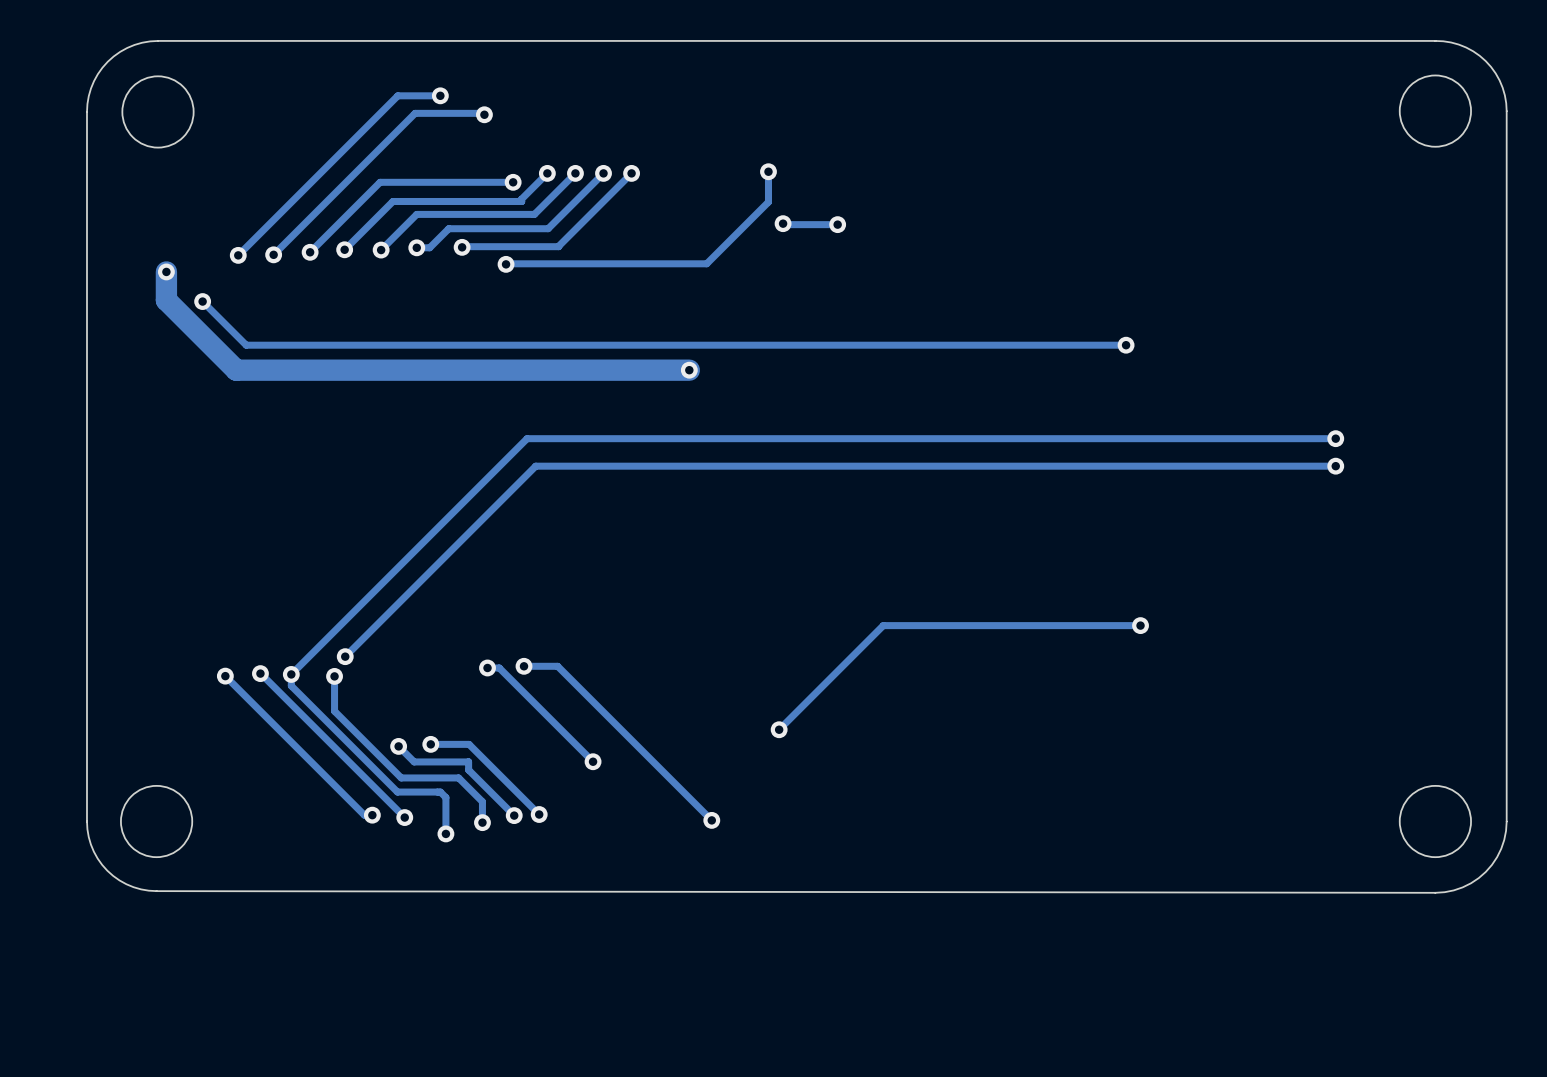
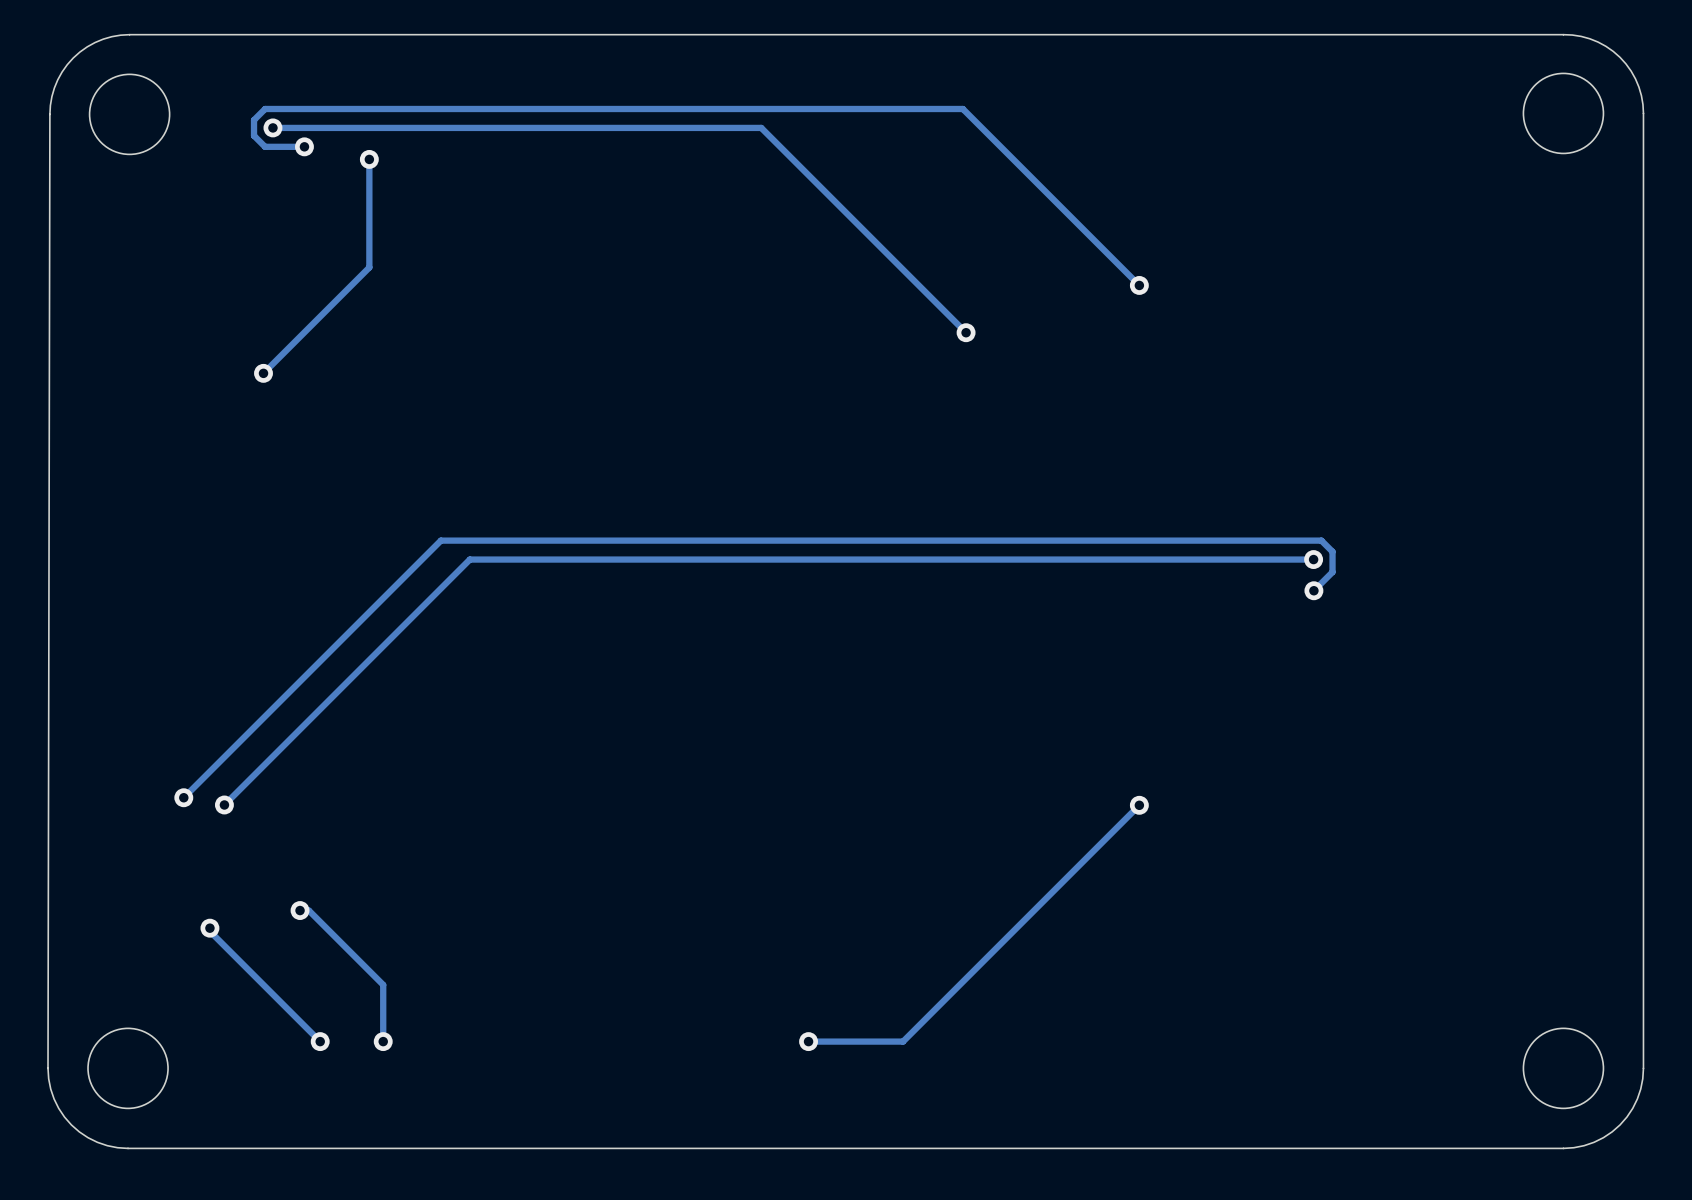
track: (440, 95) (397, 95) (238, 255) -> none
via: (440, 95) -> none
board edge: (86, 111) (86, 821) (88, 837) (97, 858) (113, 875) (126, 884) (141, 889) (156, 891) (1435, 892) (1462, 887) (1485, 871) (1501, 848) (1506, 821) -> (49, 114) (48, 1068) (50, 1089) (58, 1108) (71, 1124) (88, 1137) (107, 1145) (128, 1148) (1573, 1147) (1594, 1142) (1612, 1131) (1626, 1117) (1640, 1089) (1643, 1068) (1643, 910)
track: (484, 114) (415, 113) (273, 254) -> none
via: (484, 114) -> none
track: none -> (272, 127) (761, 127) (966, 332)
via: none -> (272, 127)
track: none -> (304, 146) (265, 146) (254, 135) (254, 120) (265, 108) (962, 108) (1139, 285)
via: none -> (304, 146)
track: none -> (369, 159) (369, 267) (263, 373)
via: none -> (369, 159)
track: (768, 171) (768, 202) (706, 263) (506, 264) -> none
via: (768, 171) -> none
track: (547, 173) (521, 201) -> none
via: (547, 173) -> none
track: (575, 173) (534, 214) (416, 214) (381, 250) -> none
via: (575, 173) -> none
track: (603, 173) (548, 228) (448, 228) (429, 247) (416, 247) -> none
via: (603, 173) -> none
track: (631, 173) (558, 246) -> none
via: (631, 173) -> none
track: (513, 182) (380, 182) (310, 252) -> none
via: (513, 182) -> none
track: (521, 201) (392, 201) (344, 249) -> none
track: (783, 223) (837, 224) -> none
via: (783, 223) -> none
via: (837, 224) -> none
track: (558, 246) (462, 247) -> none
via: (416, 247) -> none
via: (462, 247) -> none
via: (344, 249) -> none
via: (381, 250) -> none
via: (310, 252) -> none
via: (273, 254) -> none
via: (238, 255) -> none
via: (506, 264) -> none
via: none -> (1139, 285)
track: (166, 271) (166, 300) (236, 370) (689, 370) -> none
via: (166, 271) -> none
track: (202, 301) (246, 345) (1126, 345) -> none
via: (202, 301) -> none
via: none -> (966, 332)
via: none -> (263, 373)
via: (1126, 345) -> none
via: (689, 370) -> none
track: (1335, 438) (527, 438) (291, 674) (291, 685) (397, 792) (440, 792) (445, 797) (445, 833) -> none
via: (1335, 438) -> none
track: (1335, 466) (535, 466) (345, 656) -> none
via: (1335, 466) -> none
track: none -> (1313, 559) (469, 559) (224, 804)
via: none -> (1313, 559)
track: none -> (1313, 590) (1332, 572) (1332, 551) (1321, 540) (440, 540) (183, 797)
via: none -> (1313, 590)
track: (1140, 625) (883, 625) (779, 729) -> none
via: (1140, 625) -> none
via: (345, 656) -> none
track: (524, 666) (557, 666) (711, 820) -> none
via: (524, 666) -> none
track: (487, 667) (499, 667) (593, 761) -> none
via: (487, 667) -> none
track: (260, 673) (404, 817) -> none
via: (260, 673) -> none
via: (291, 674) -> none
track: (225, 676) (364, 815) (372, 815) -> none
via: (225, 676) -> none
track: (334, 676) (334, 711) (401, 777) (458, 777) (482, 801) (482, 822) -> none
via: (334, 676) -> none
via: none -> (183, 797)
via: none -> (224, 804)
track: none -> (1139, 805) (903, 1041) (808, 1041)
via: none -> (1139, 805)
via: (779, 729) -> none
track: (430, 744) (469, 744) (539, 814) -> none
via: (430, 744) -> none
track: (398, 746) (414, 761) (468, 761) -> none
via: (398, 746) -> none
track: (468, 761) (468, 769) (514, 815) -> none
via: (593, 761) -> none
via: (539, 814) -> none
via: (372, 815) -> none
via: (514, 815) -> none
via: (404, 817) -> none
via: (711, 820) -> none
round board edge position: (156, 821) -> (128, 1068)
track: none -> (300, 910) (308, 910) (383, 984) (383, 1041)
via: none -> (300, 910)
round board edge position: (1435, 821) -> (1563, 1068)
via: (482, 822) -> none
via: (445, 833) -> none
track: none -> (209, 928) (209, 931) (320, 1041)
via: none -> (209, 928)
via: none -> (320, 1041)
via: none -> (383, 1041)
via: none -> (808, 1041)

